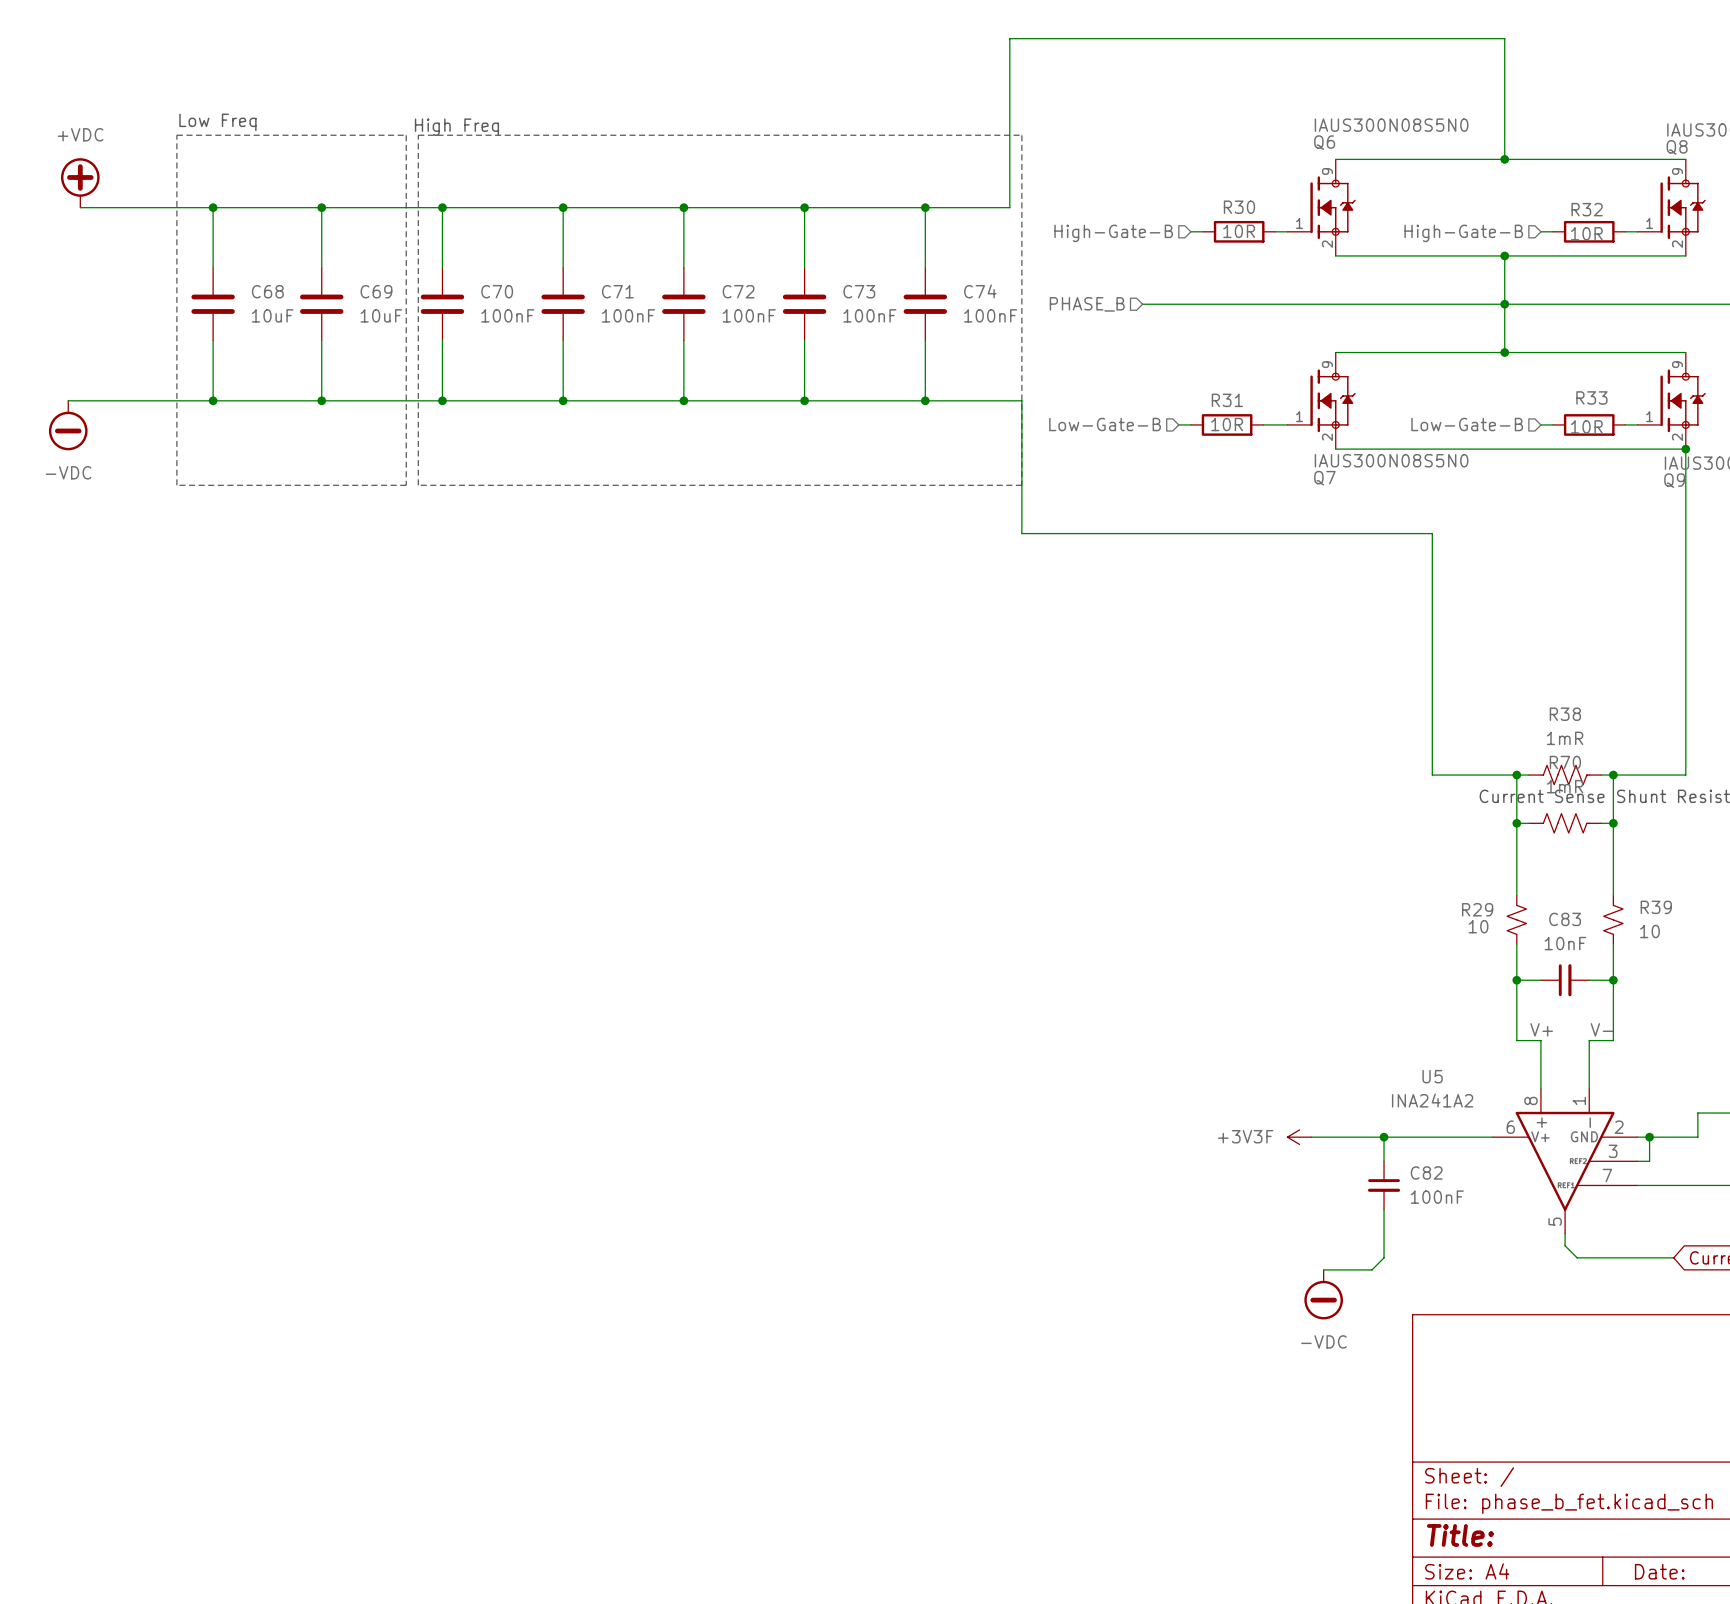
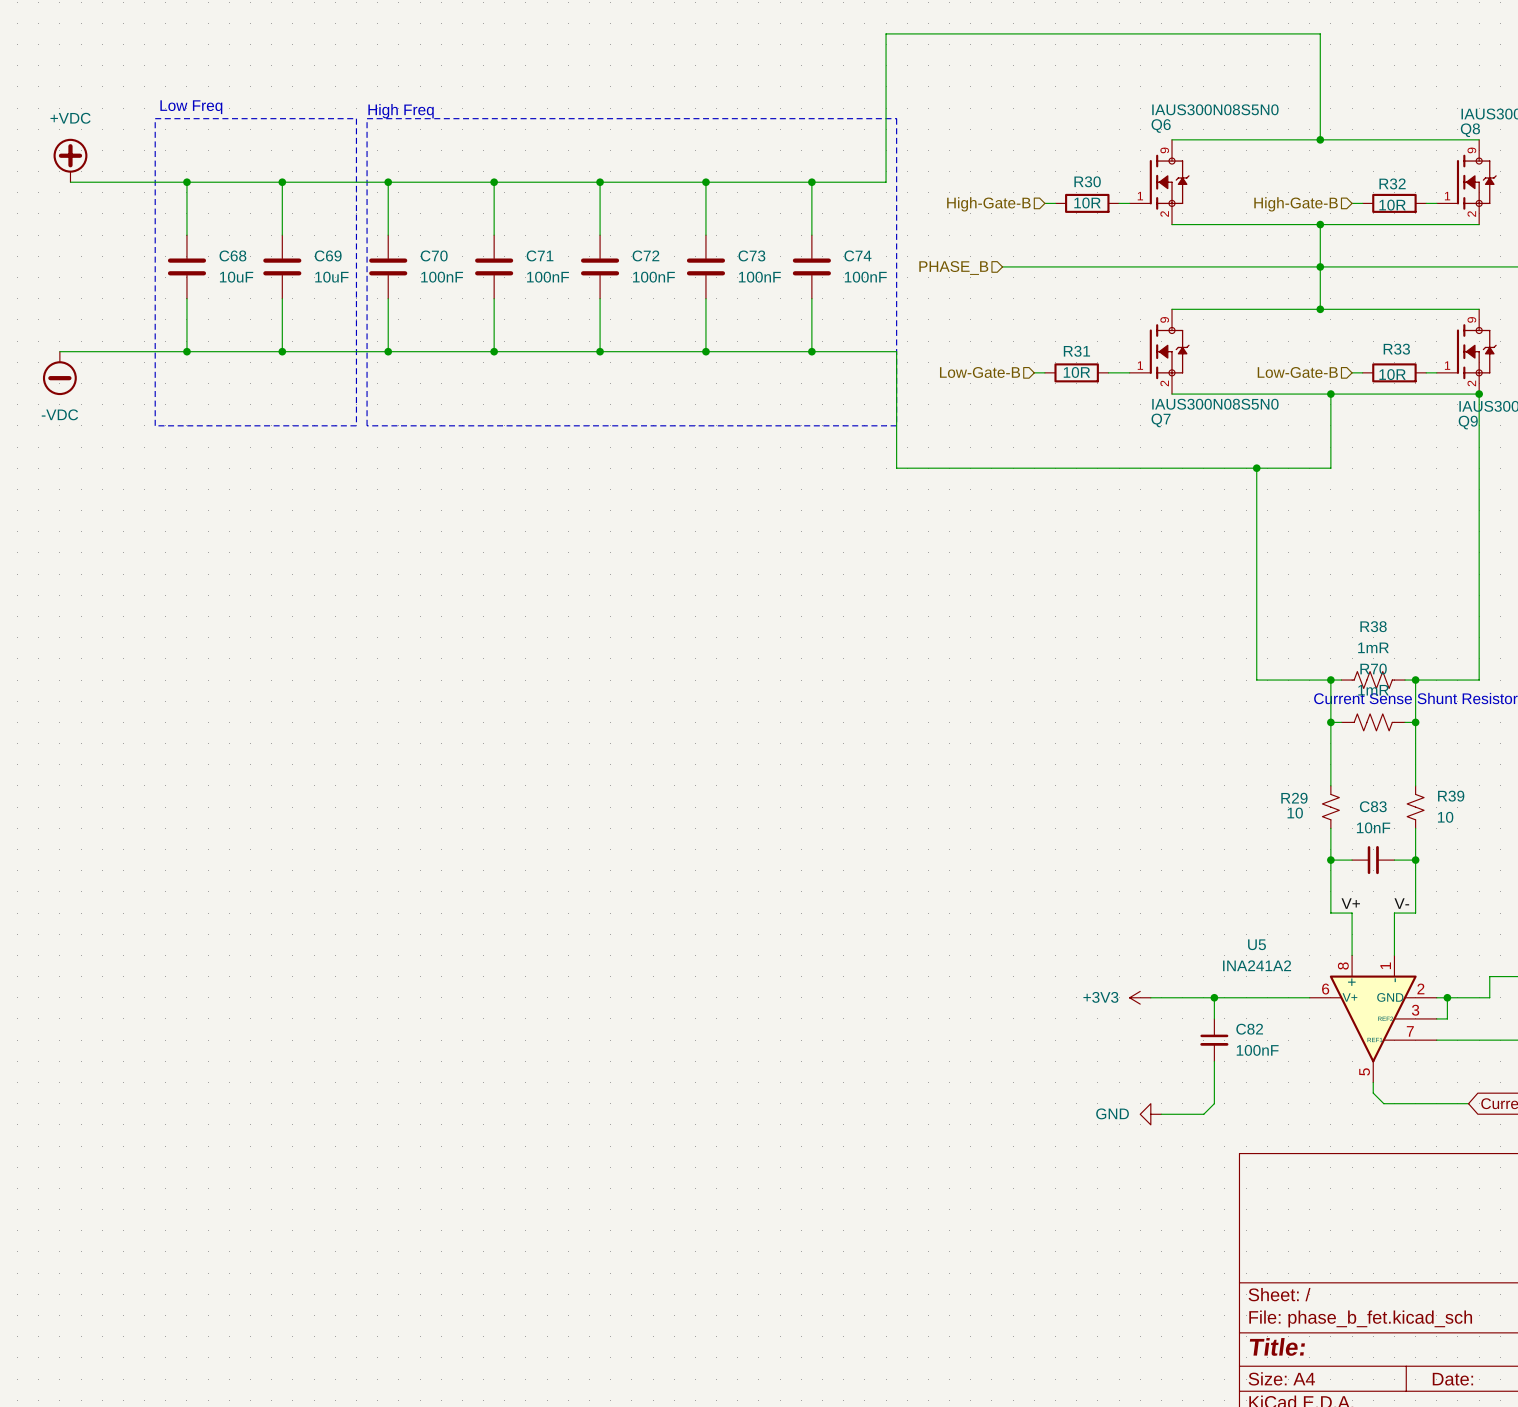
wire: none -> (1330, 394) (1330, 468) (1256, 468)
junction: none -> (1330, 394)
junction: none -> (1256, 468)
power symbol: +3V3F (1299, 1137) -> +3V3 (1140, 997)
power symbol: none -> GND (1150, 1114)
power symbol: -VDC (1323, 1294) -> none

